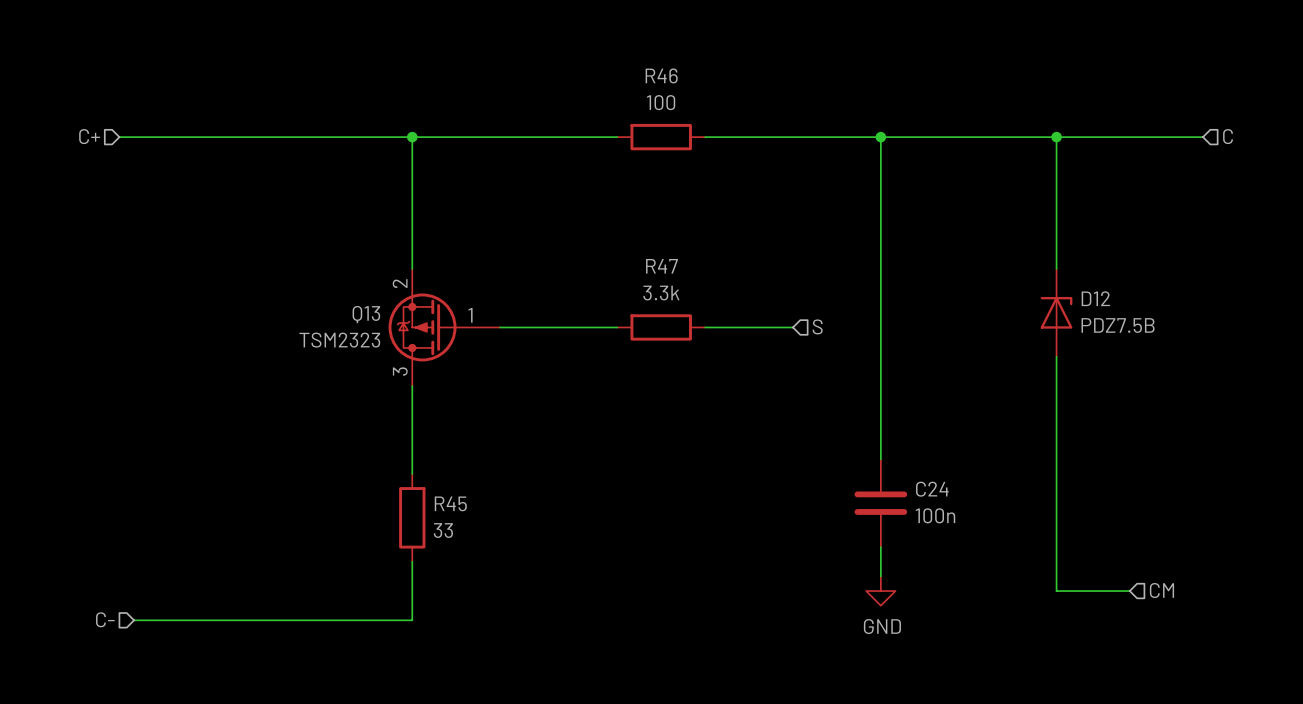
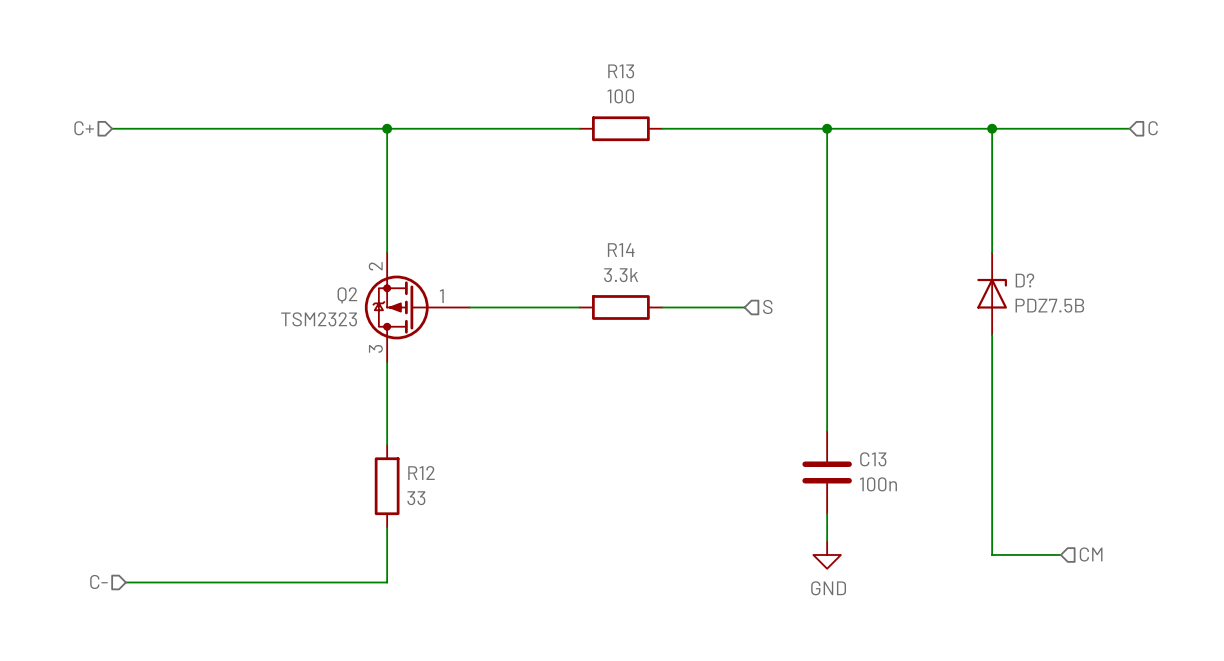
R46 name: R46 (661, 75) -> R13 (621, 71)
R47 name: R47 (661, 266) -> R14 (621, 250)
D12 name: D12 (1095, 298) -> D? (1024, 280)
Q13 name: Q13 (366, 314) -> Q2 (347, 295)
C24 name: C24 (932, 489) -> C13 (873, 459)
R45 name: R45 (450, 503) -> R12 (421, 473)

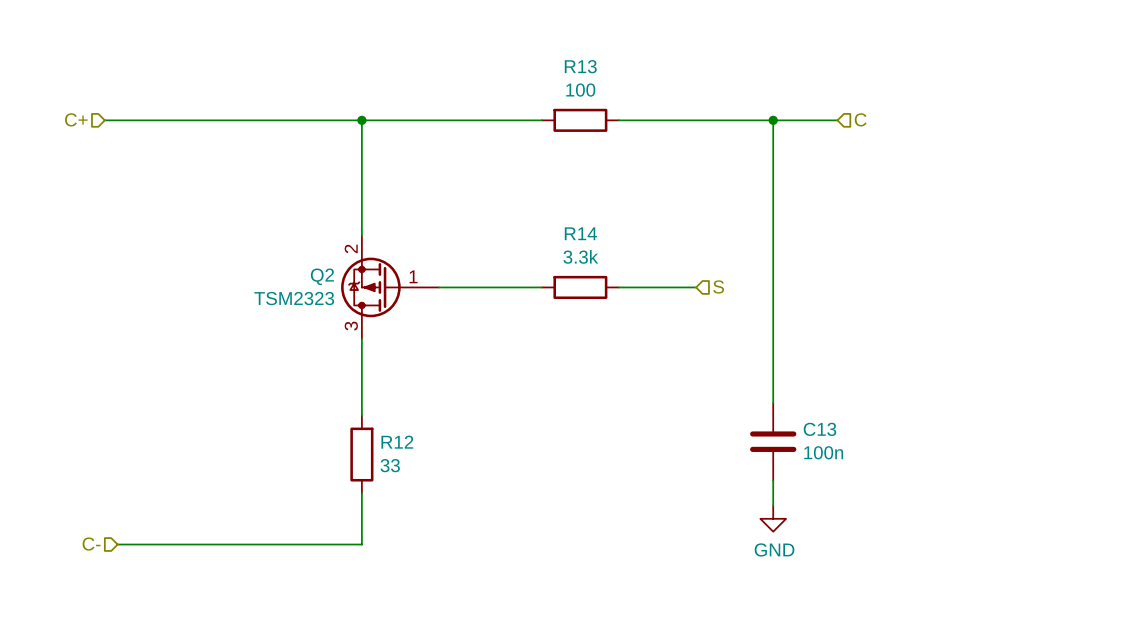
wire: (895, 128) (1129, 128) -> none
wire: (992, 128) (992, 252) -> none
junction: (992, 128) -> none
hierarchical label position: C (1153, 128) -> C (860, 119)
D?: PDZ7.5B (992, 293) -> none
wire: (992, 334) (992, 554) (1060, 554) -> none
hierarchical label: CM (1091, 554) -> none

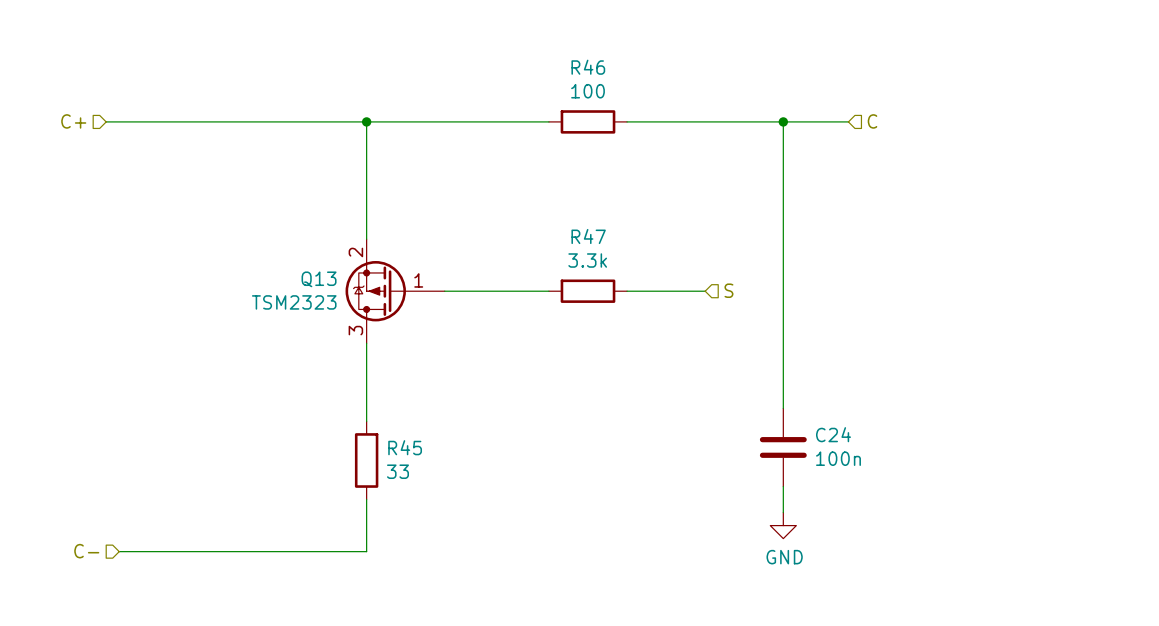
R13 name: R13 (580, 66) -> R46 (588, 67)
R14 name: R14 (580, 233) -> R47 (588, 236)
Q2 name: Q2 (322, 276) -> Q13 (319, 279)
C13 name: C13 (819, 429) -> C24 (833, 434)
R12 name: R12 (397, 442) -> R45 (405, 447)

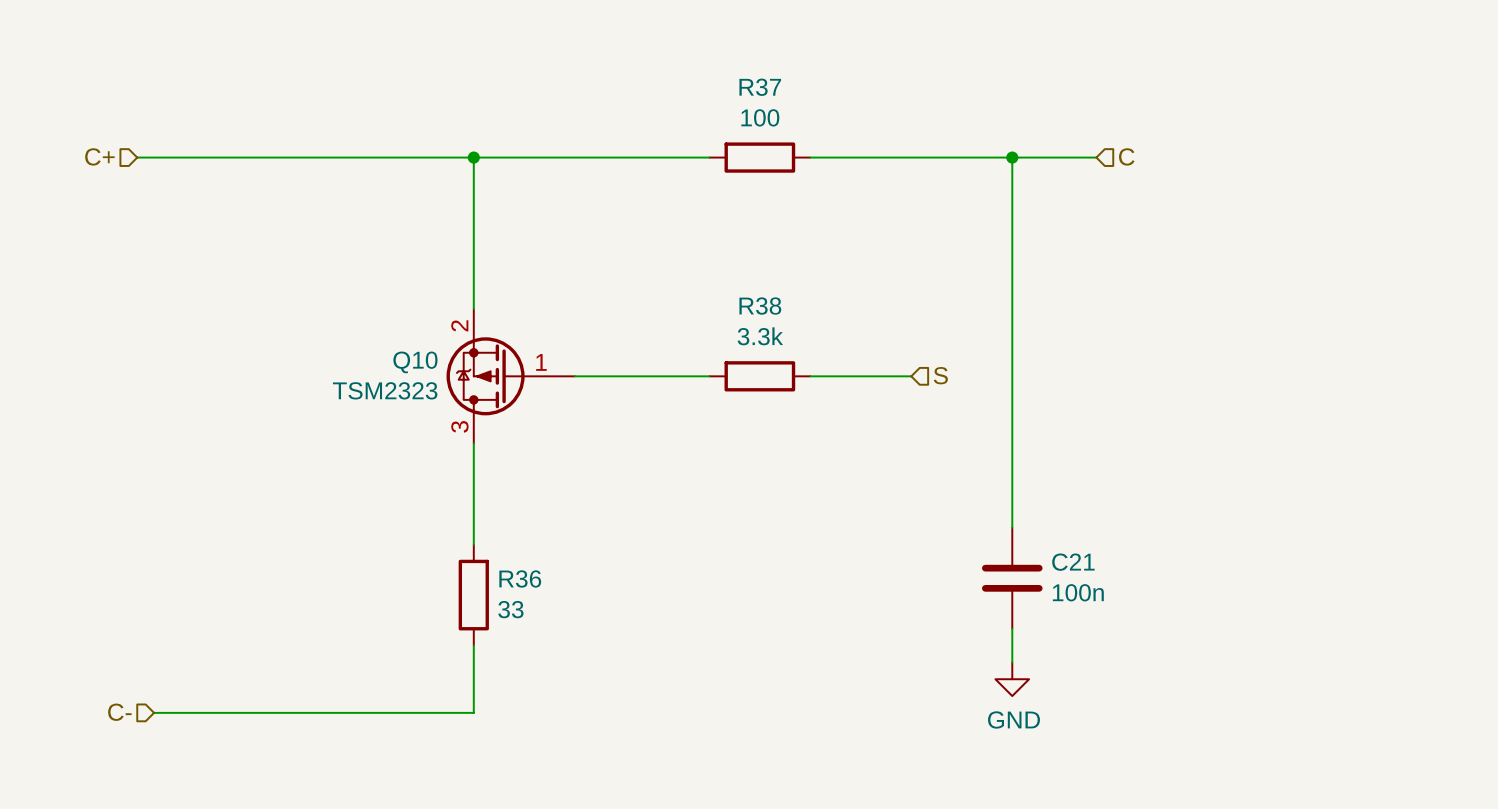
R46 name: R46 (588, 67) -> R37 (760, 87)
R47 name: R47 (588, 236) -> R38 (760, 306)
Q13 name: Q13 (319, 279) -> Q10 (415, 362)
C24 name: C24 (833, 434) -> C21 (1073, 562)
R45 name: R45 (405, 447) -> R36 (520, 578)

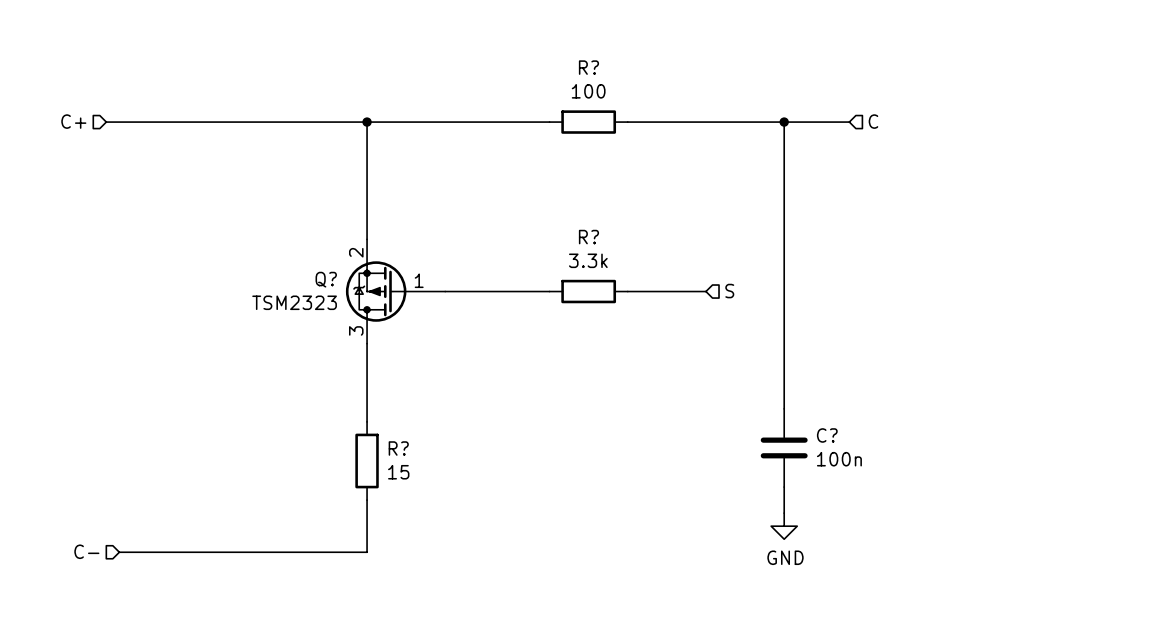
R37 name: R37 (760, 87) -> R? (588, 67)
R38 name: R38 (760, 306) -> R? (588, 237)
Q10 name: Q10 (415, 362) -> Q? (326, 279)
C21 name: C21 (1073, 562) -> C? (827, 435)
R36 name: R36 (520, 578) -> R? (398, 448)
R36 value: 33 (510, 609) -> 15 (398, 472)

